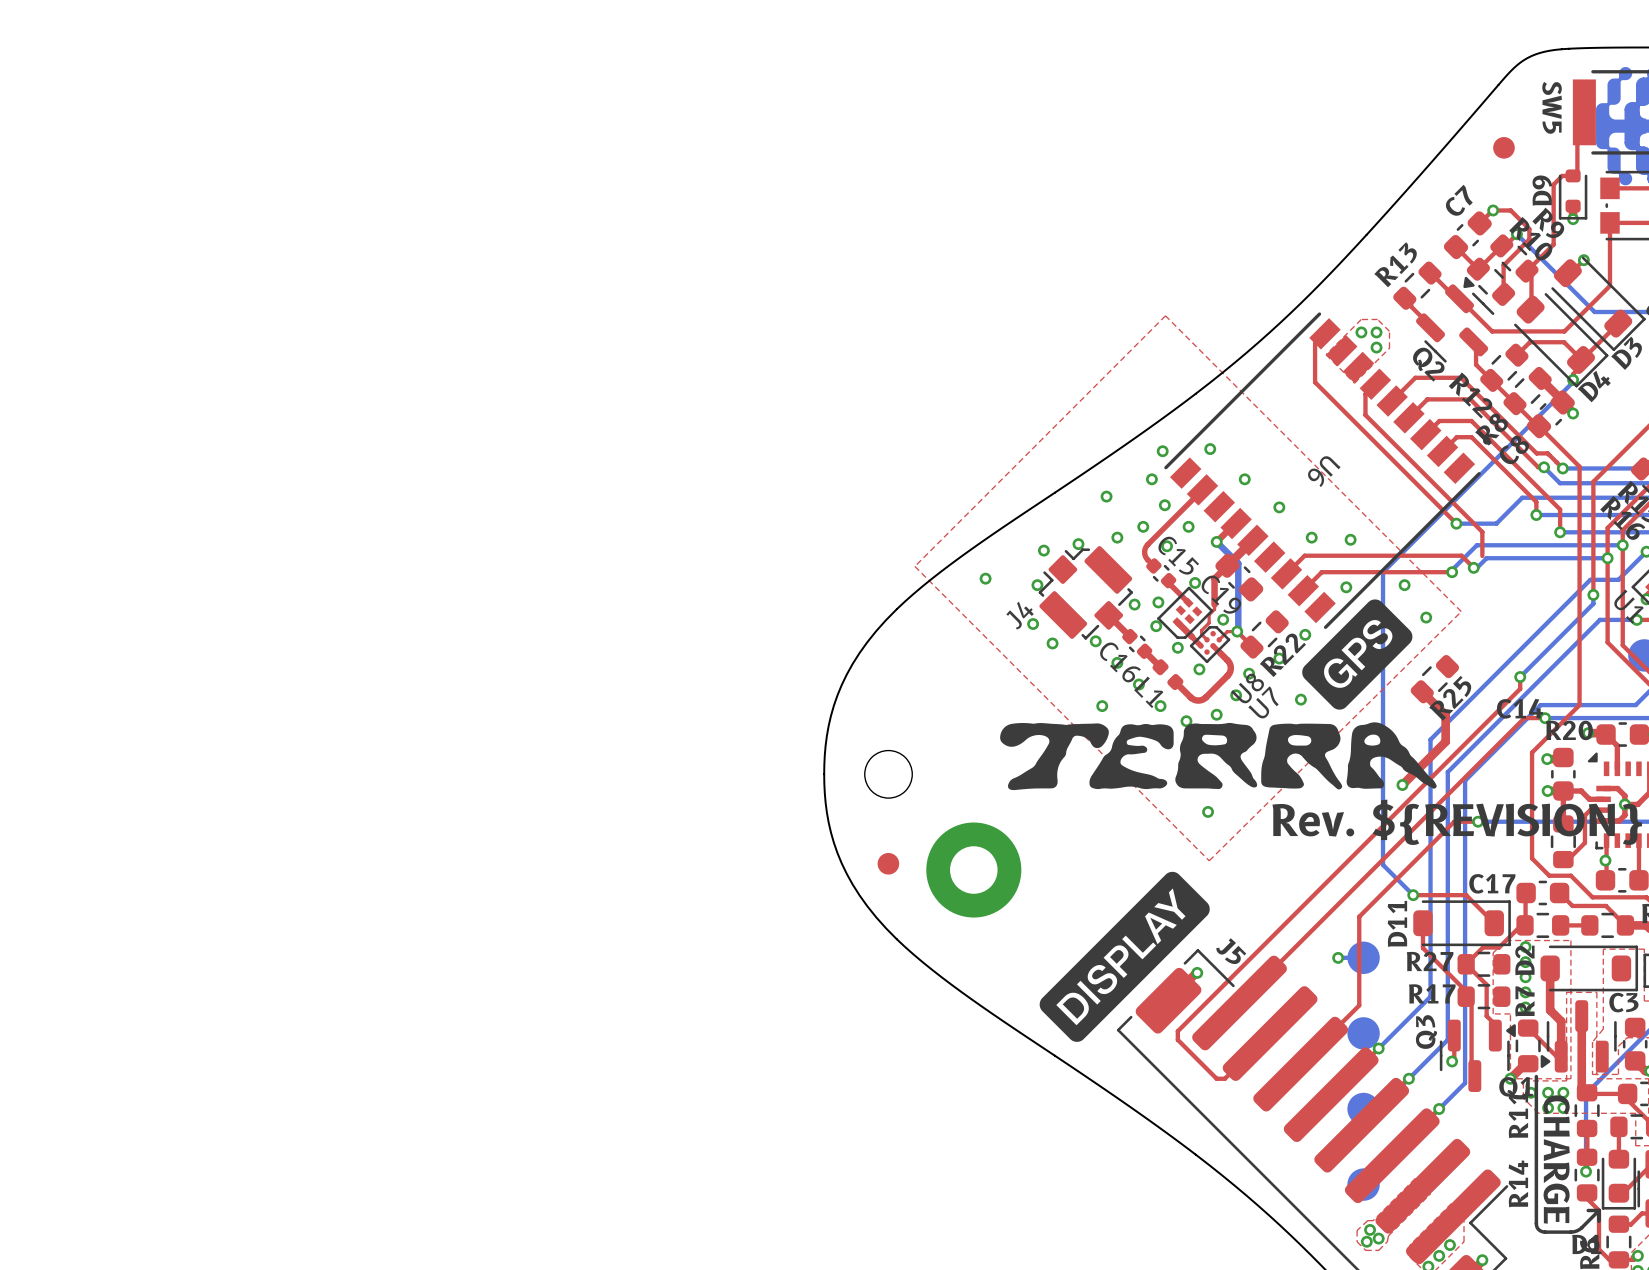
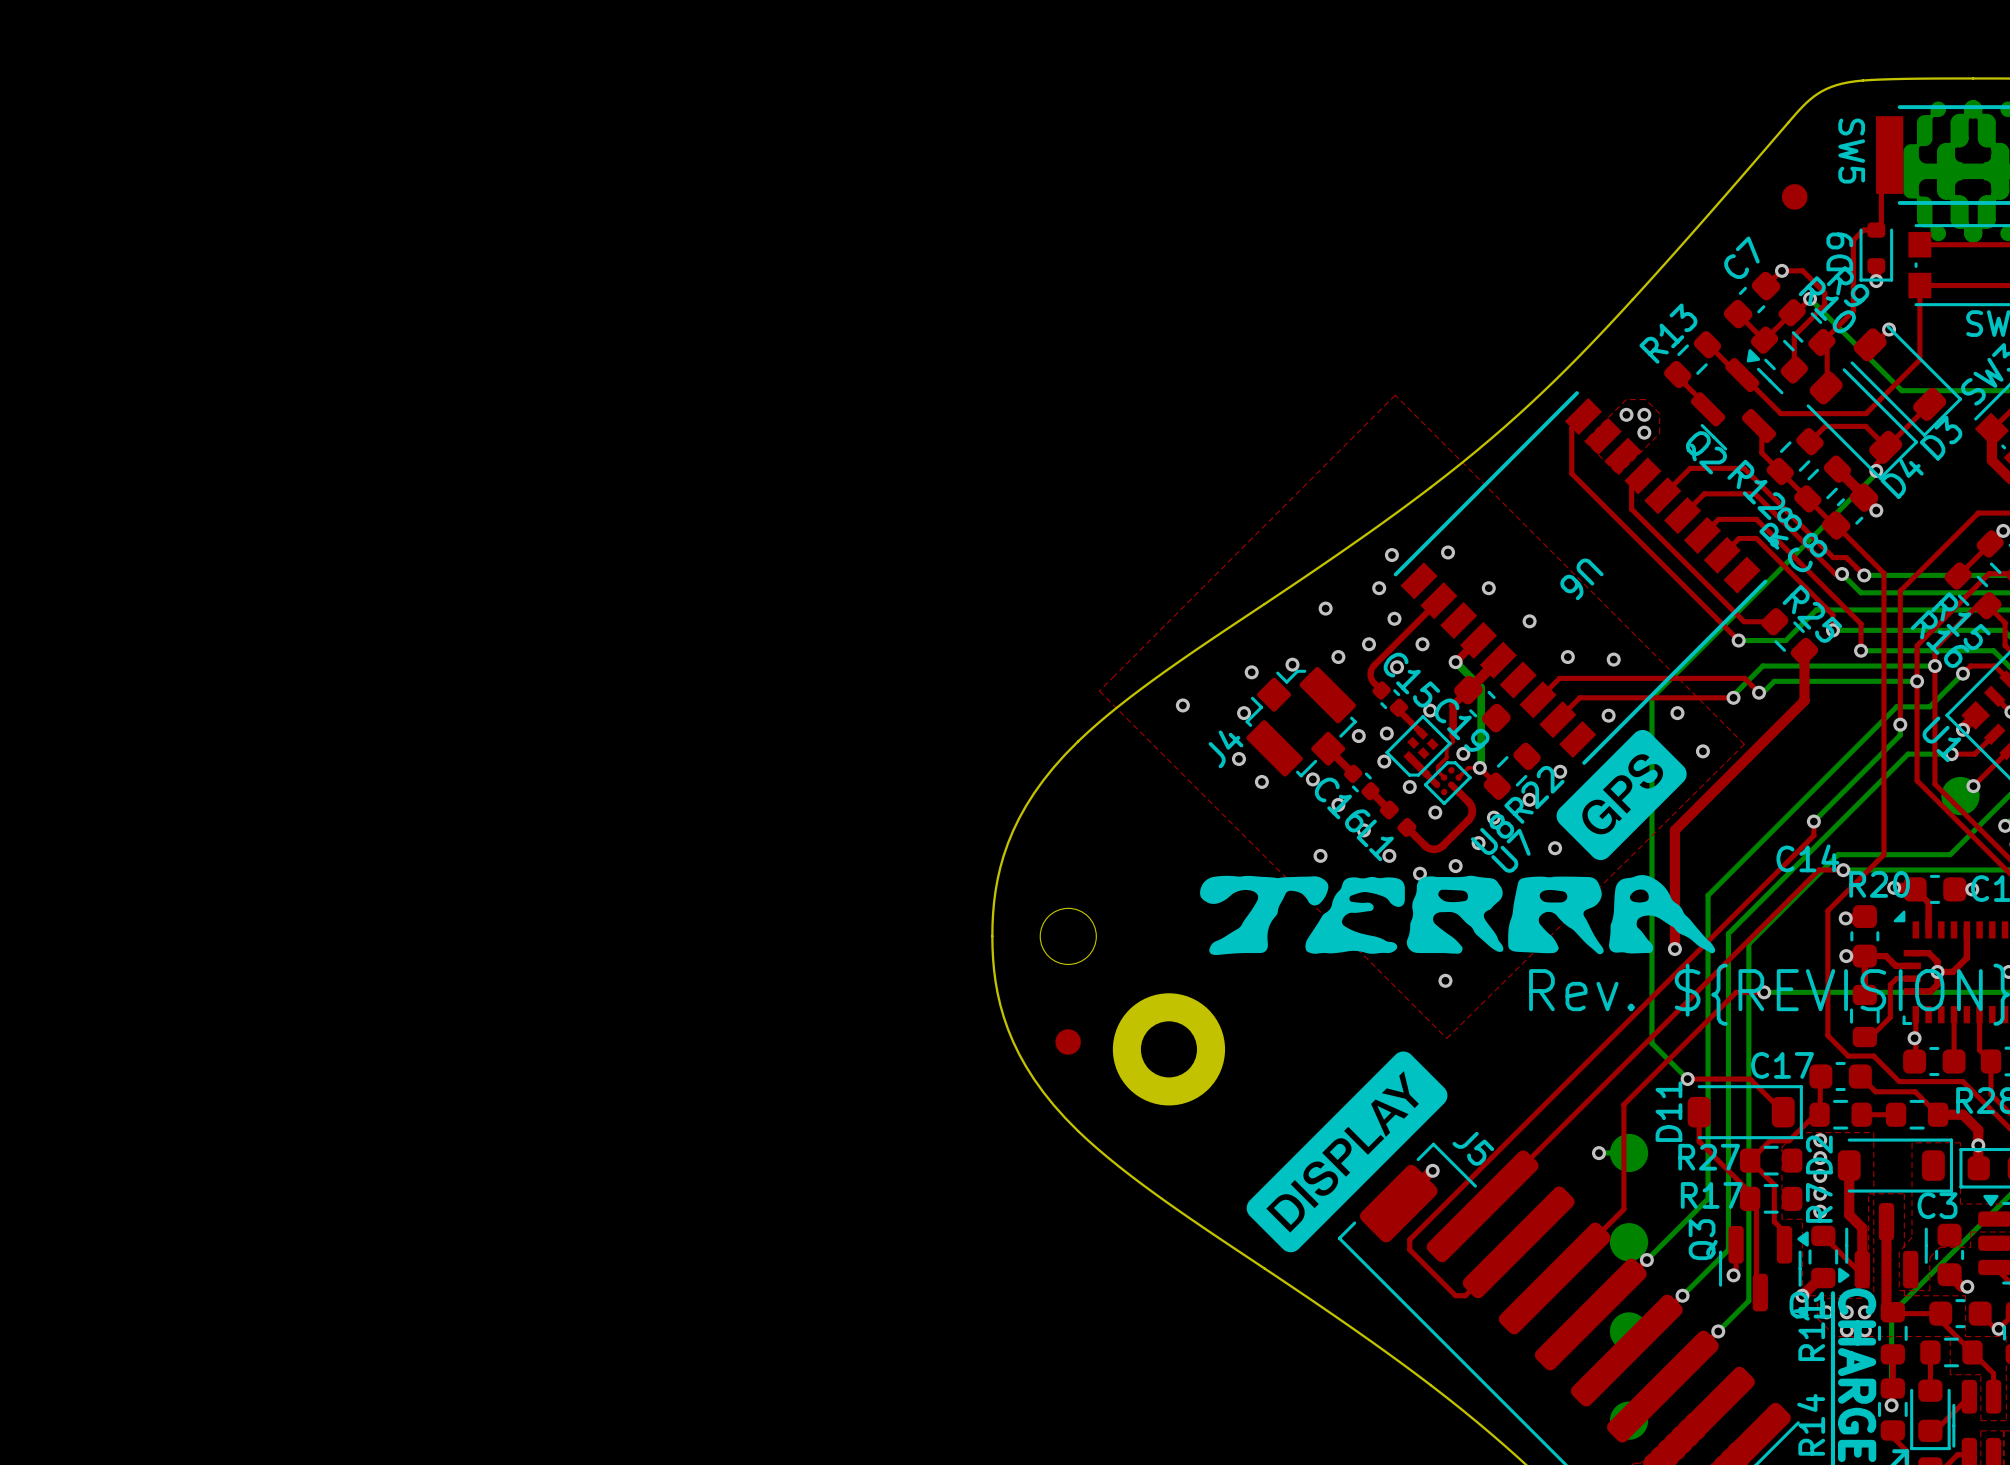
top track: (1365, 394) (1365, 415) (1482, 531) (1482, 555) -> (1631, 487) (1631, 509) (1744, 621) (1774, 621)
R25 rotation: 0° (1434, 679) -> 90° clockwise (1789, 636)
R25 position: (1434, 679) -> (1789, 636)
top track: (1422, 691) (1445, 715) (1445, 741) (1402, 785) -> (1804, 651) (1804, 700) (1674, 830) (1674, 949)

